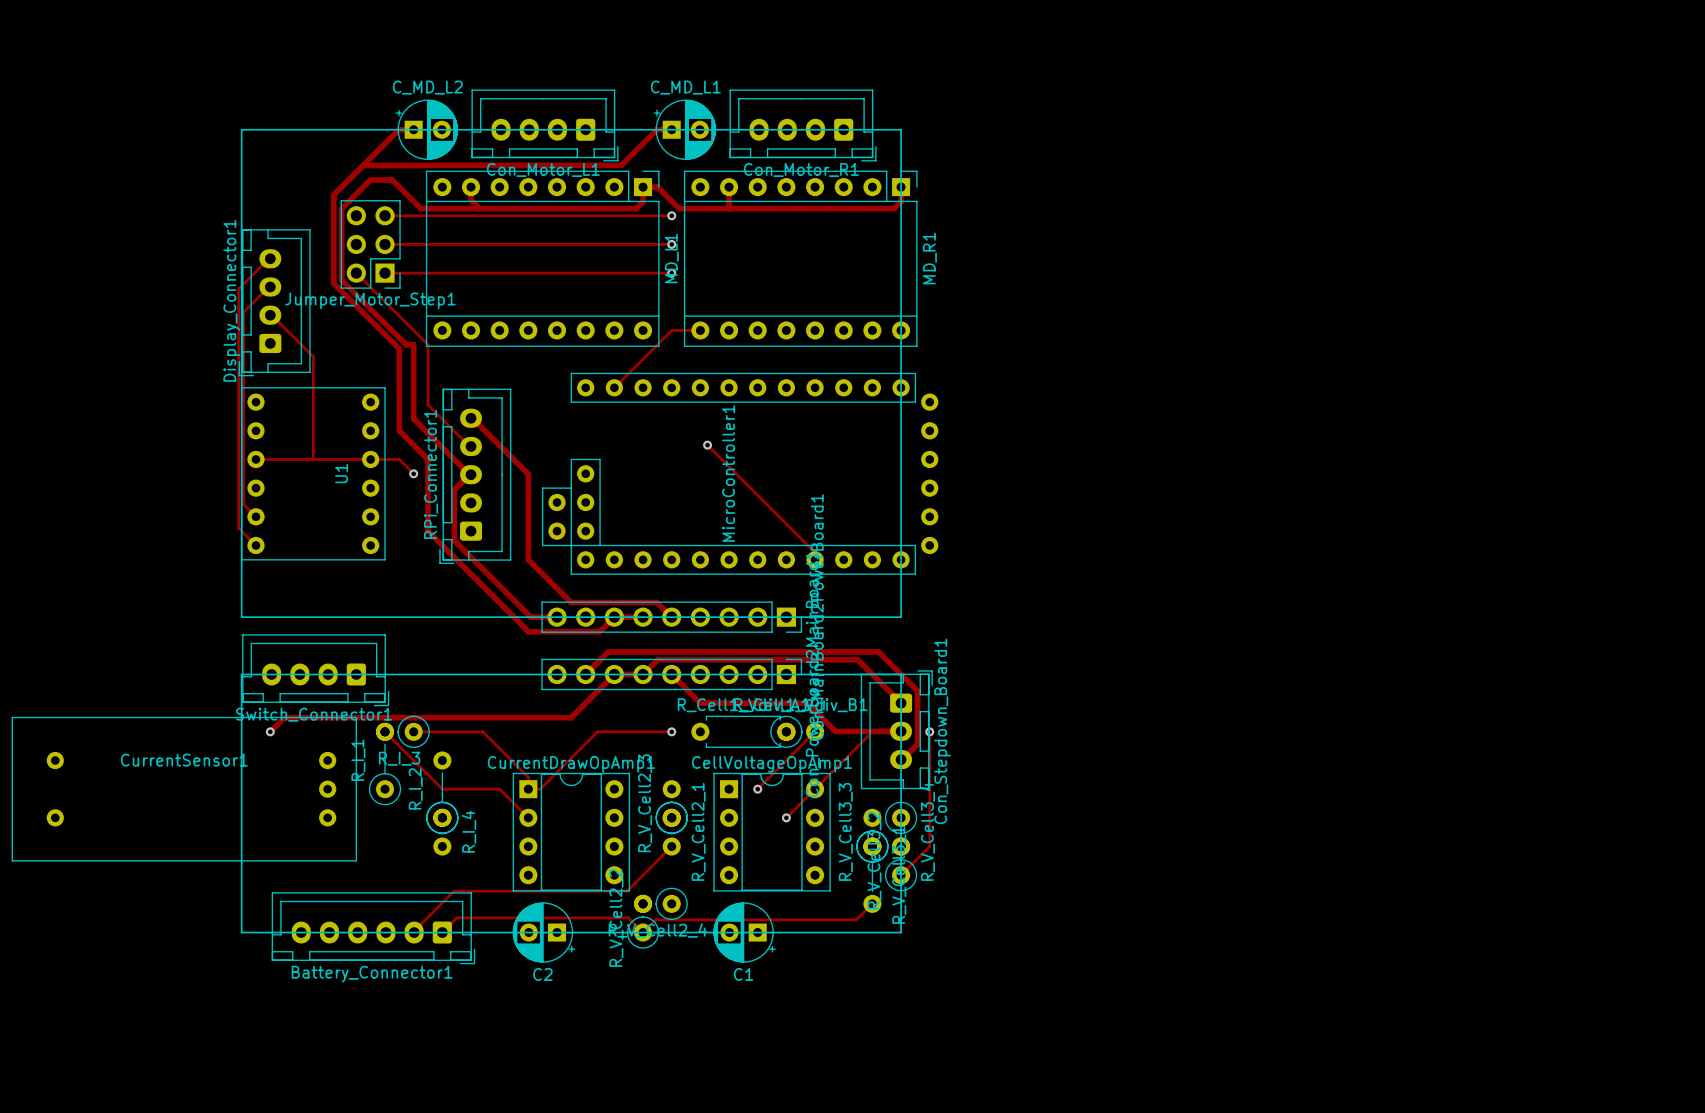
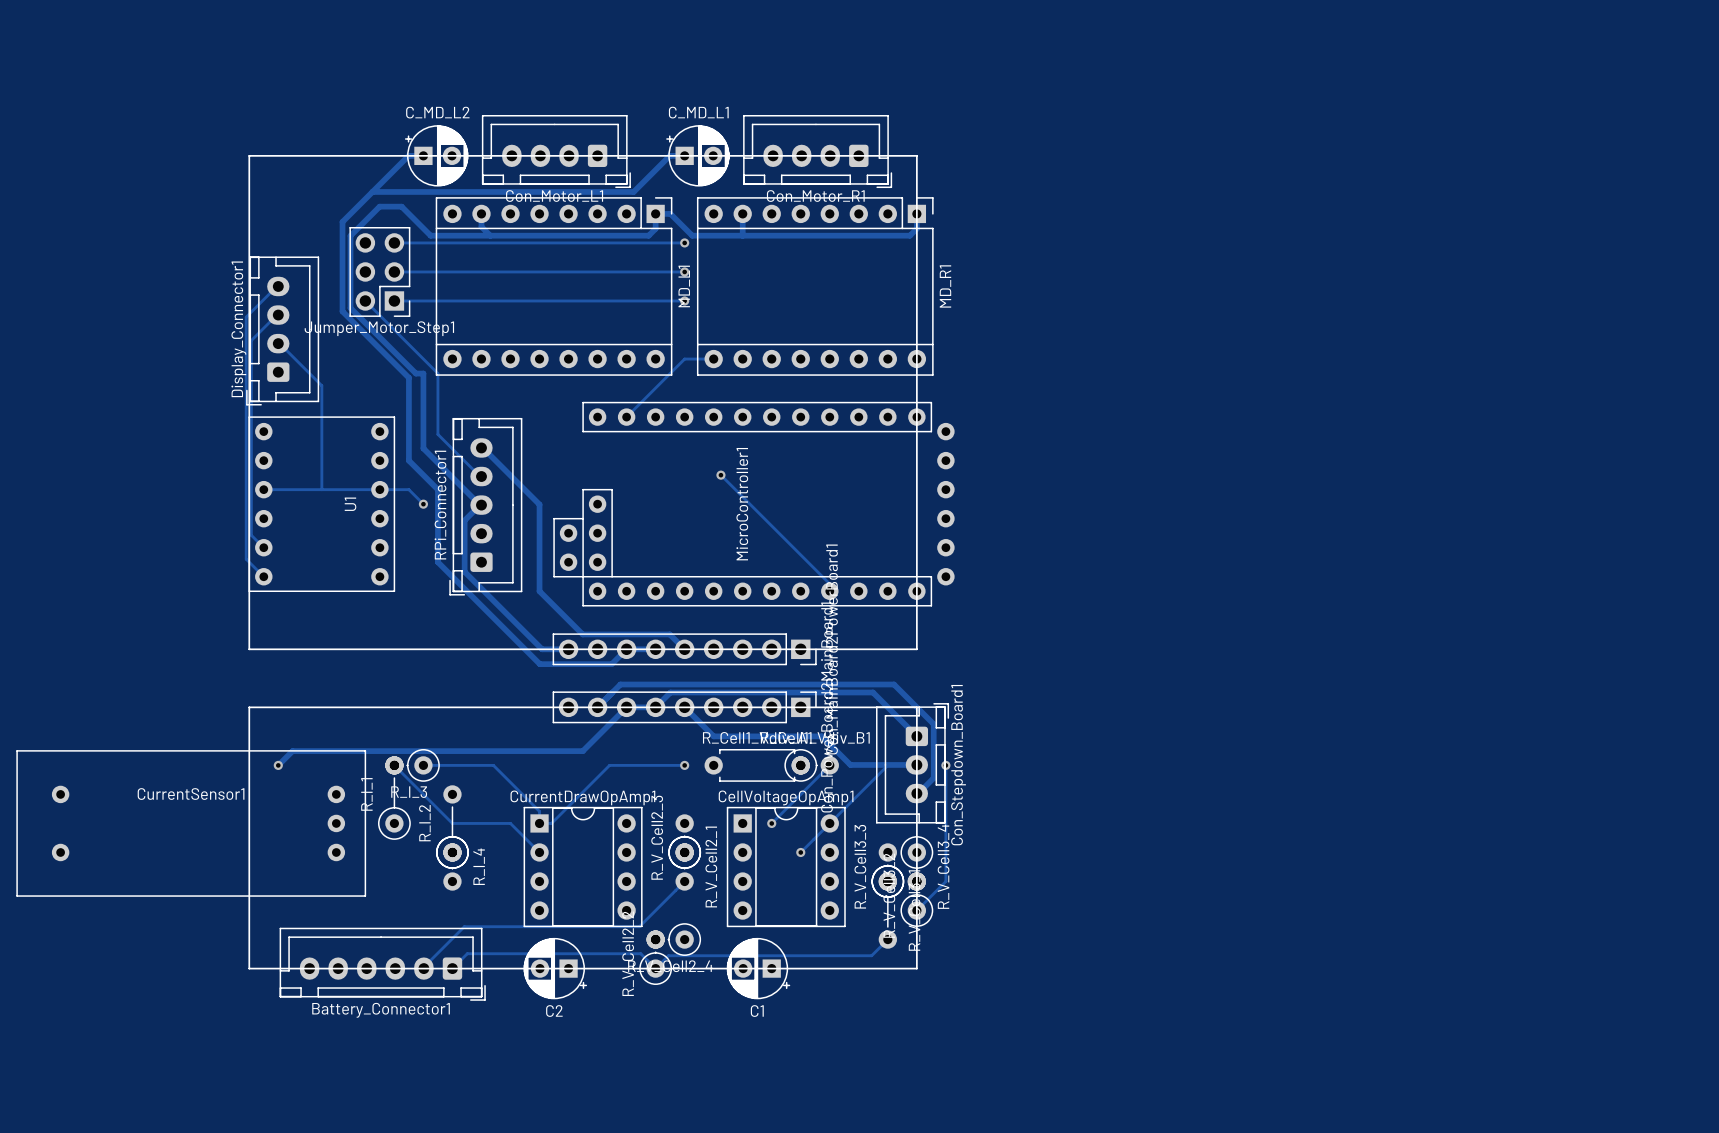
Switch_Connector1: (315, 670) -> none

